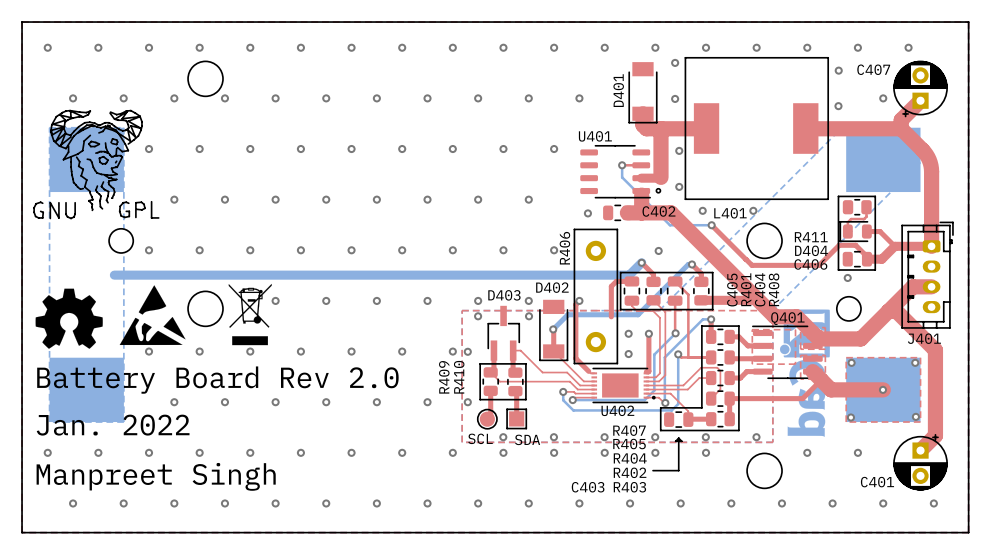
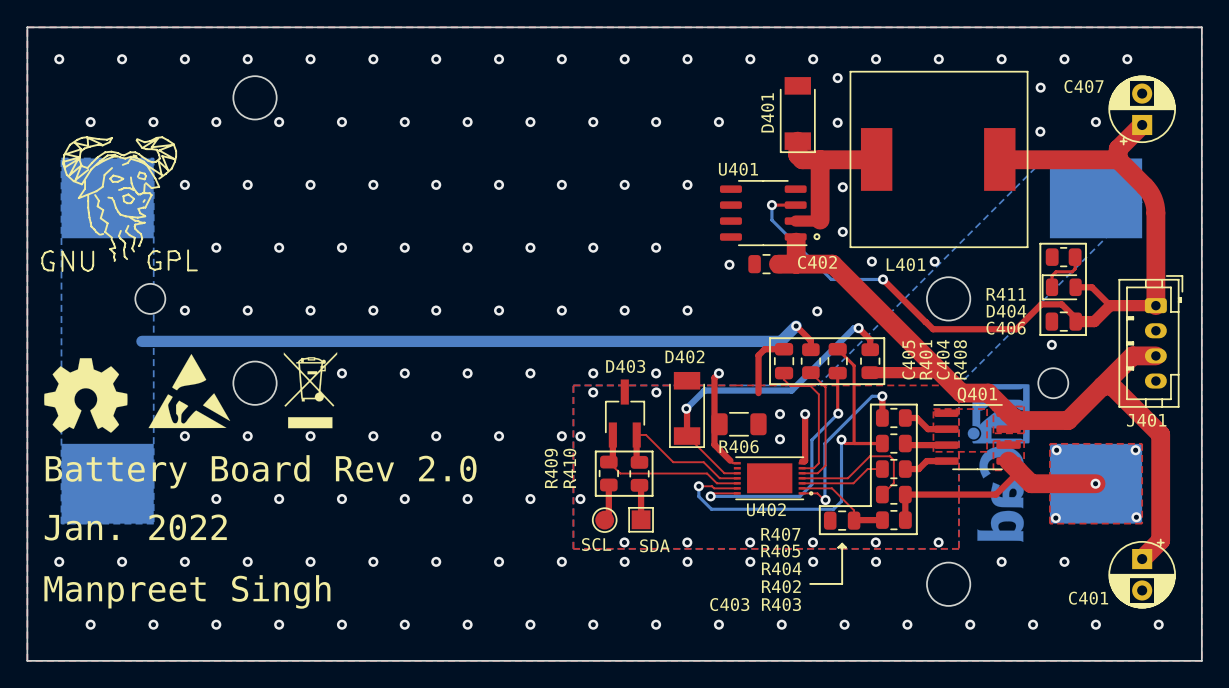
R406 footprint: [573, 228, 618, 365] -> [711, 412, 767, 437]
R406 name position: R406 (564, 248) -> R406 (739, 446)

